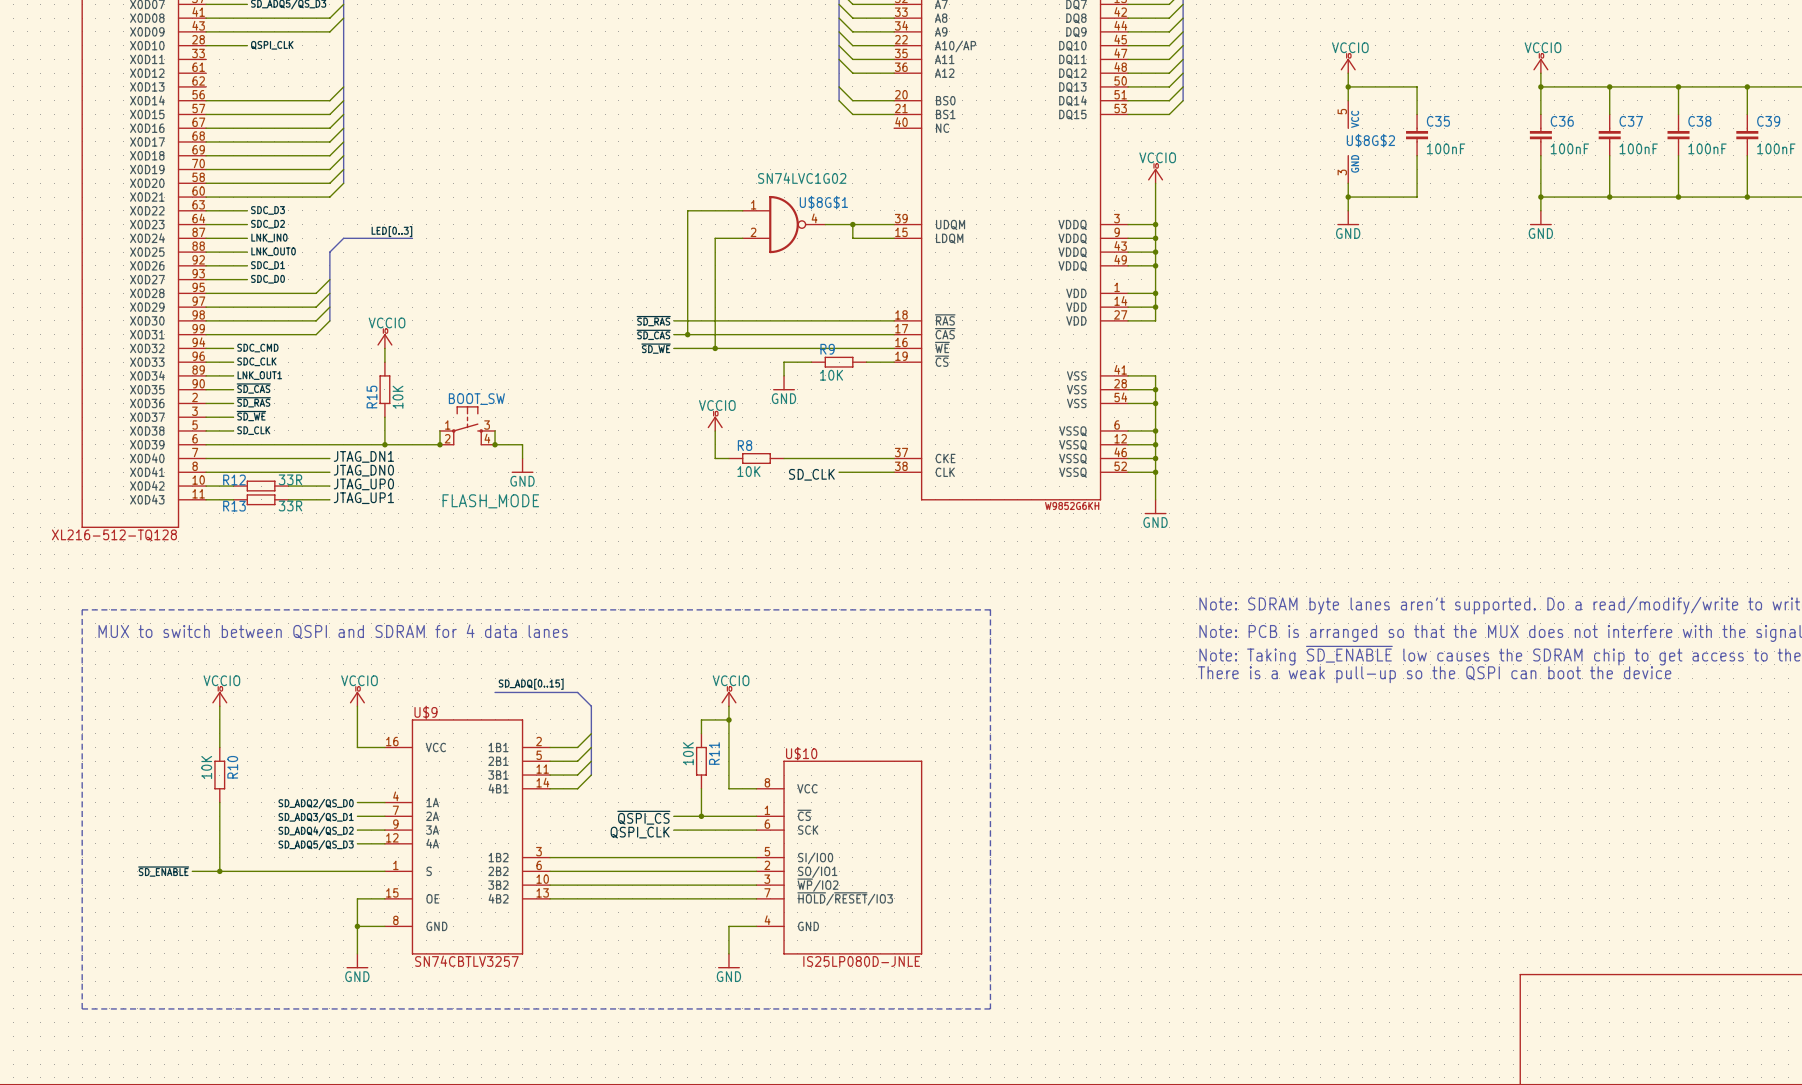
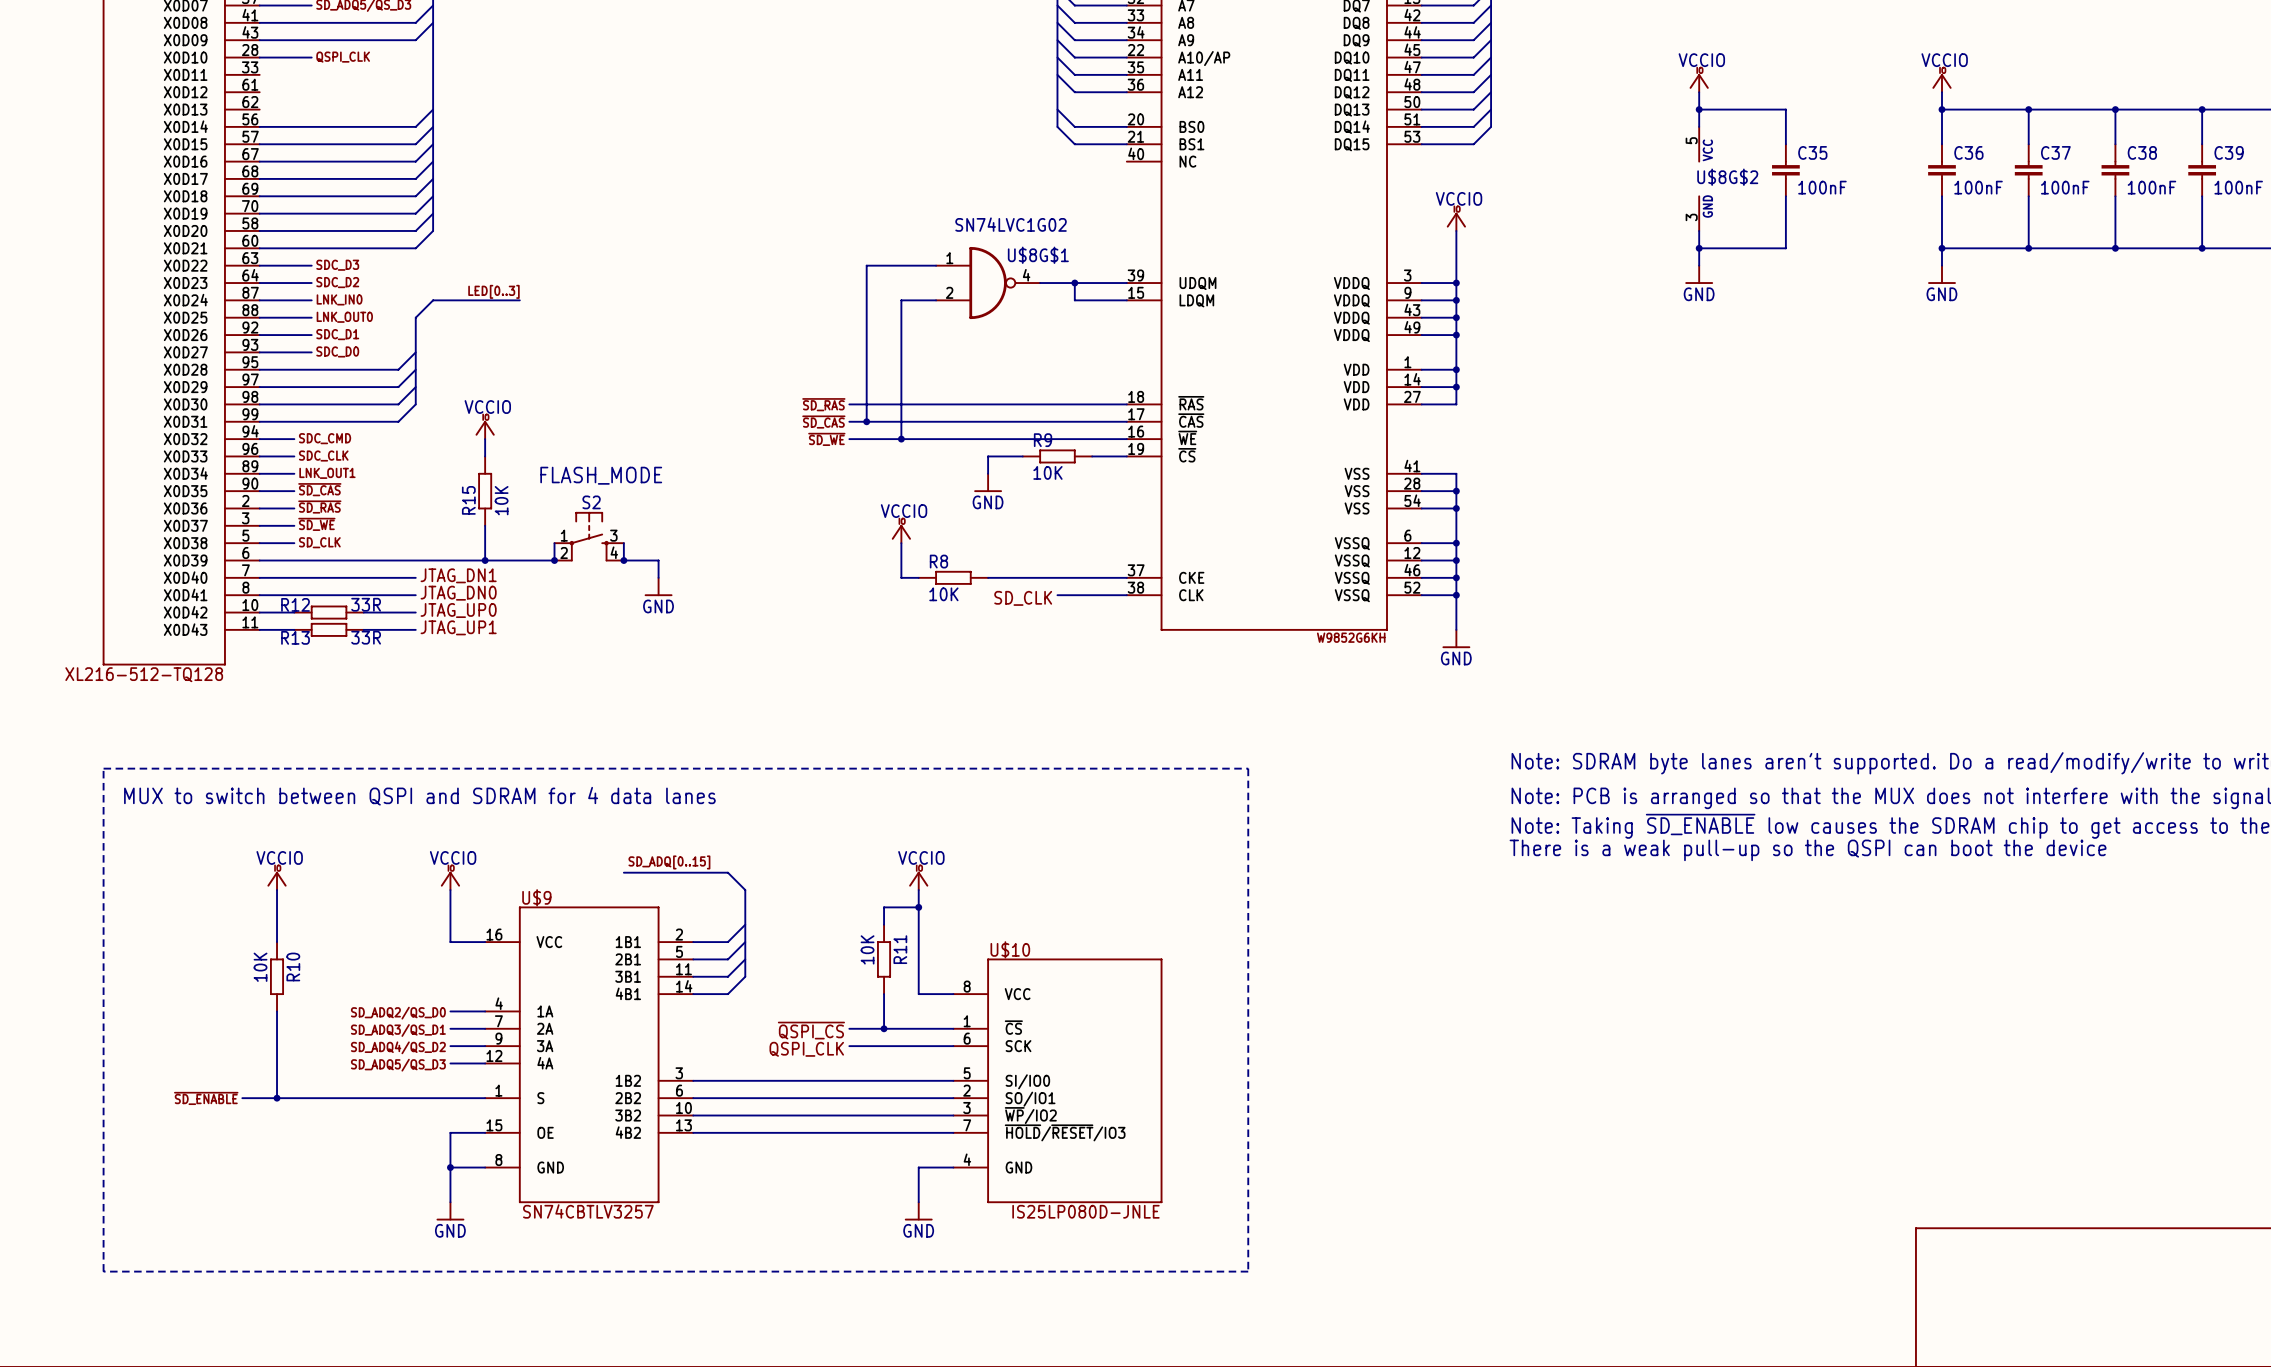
BOOT_SW name: BOOT_SW (476, 399) -> S2 (591, 502)
BOOT_SW value position: FLASH_MODE (490, 501) -> FLASH_MODE (601, 475)

